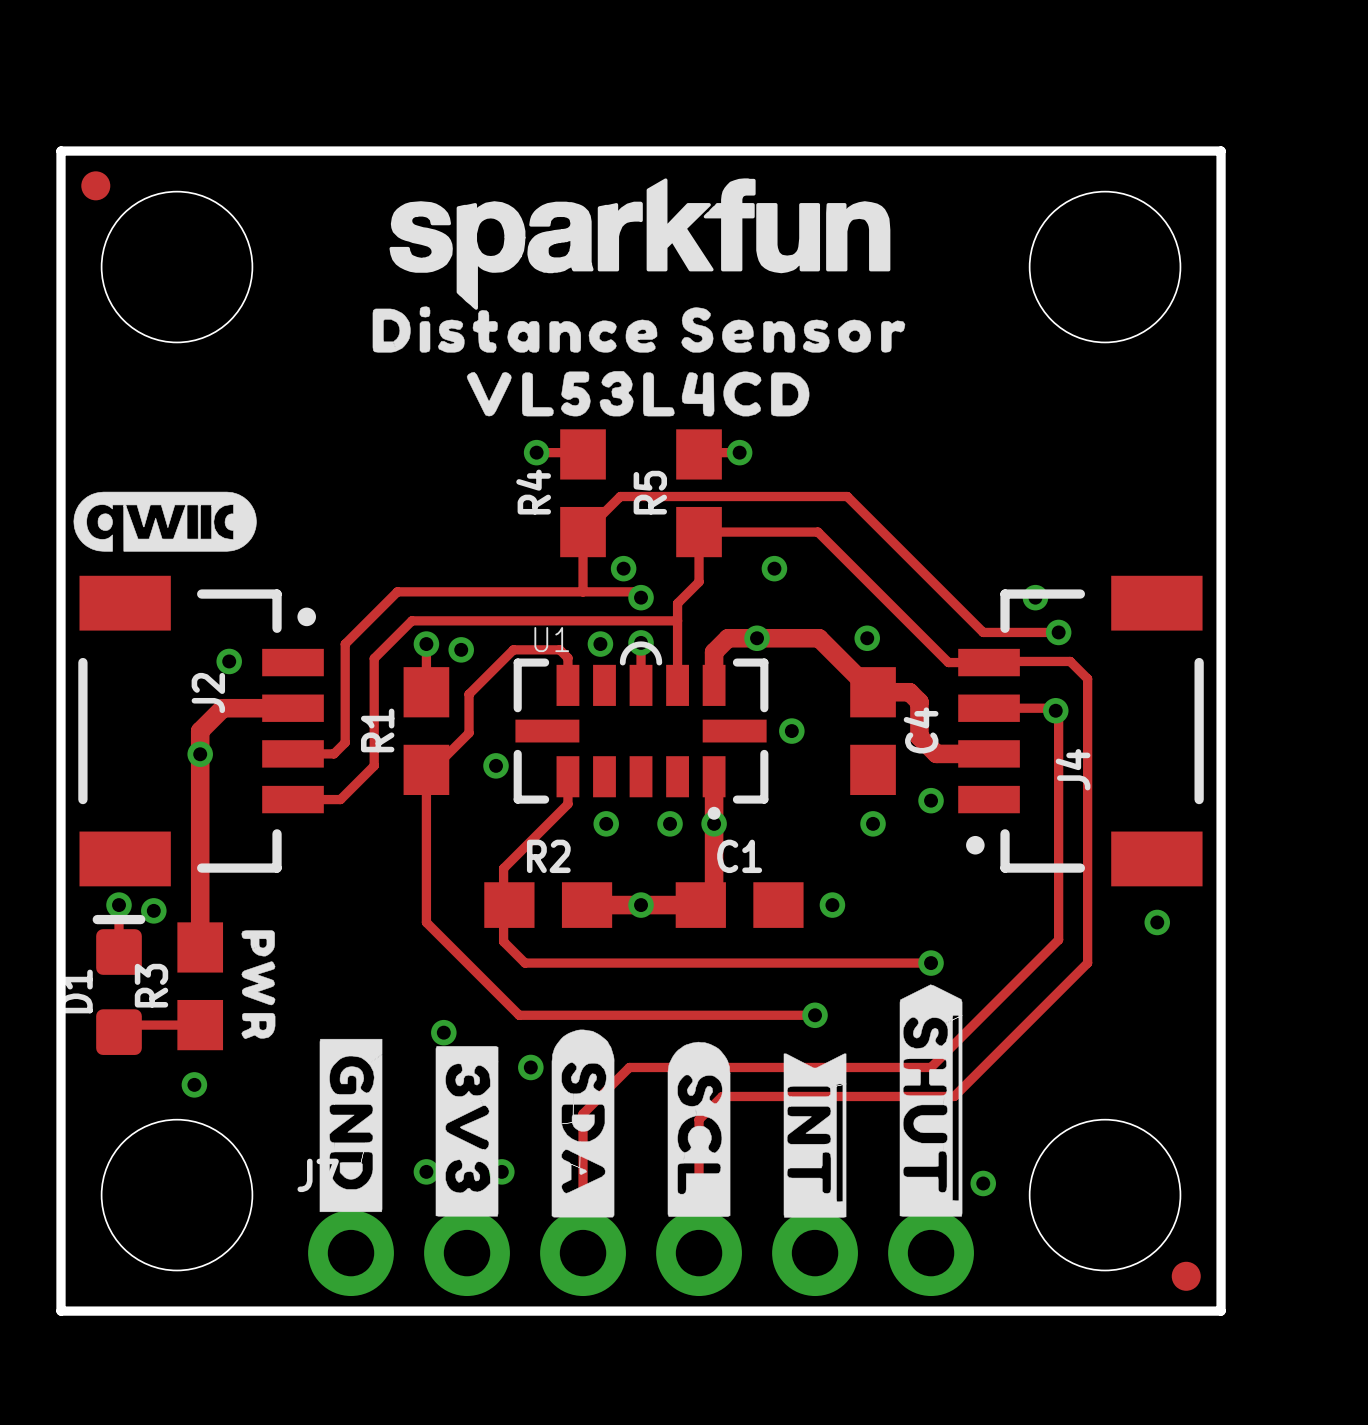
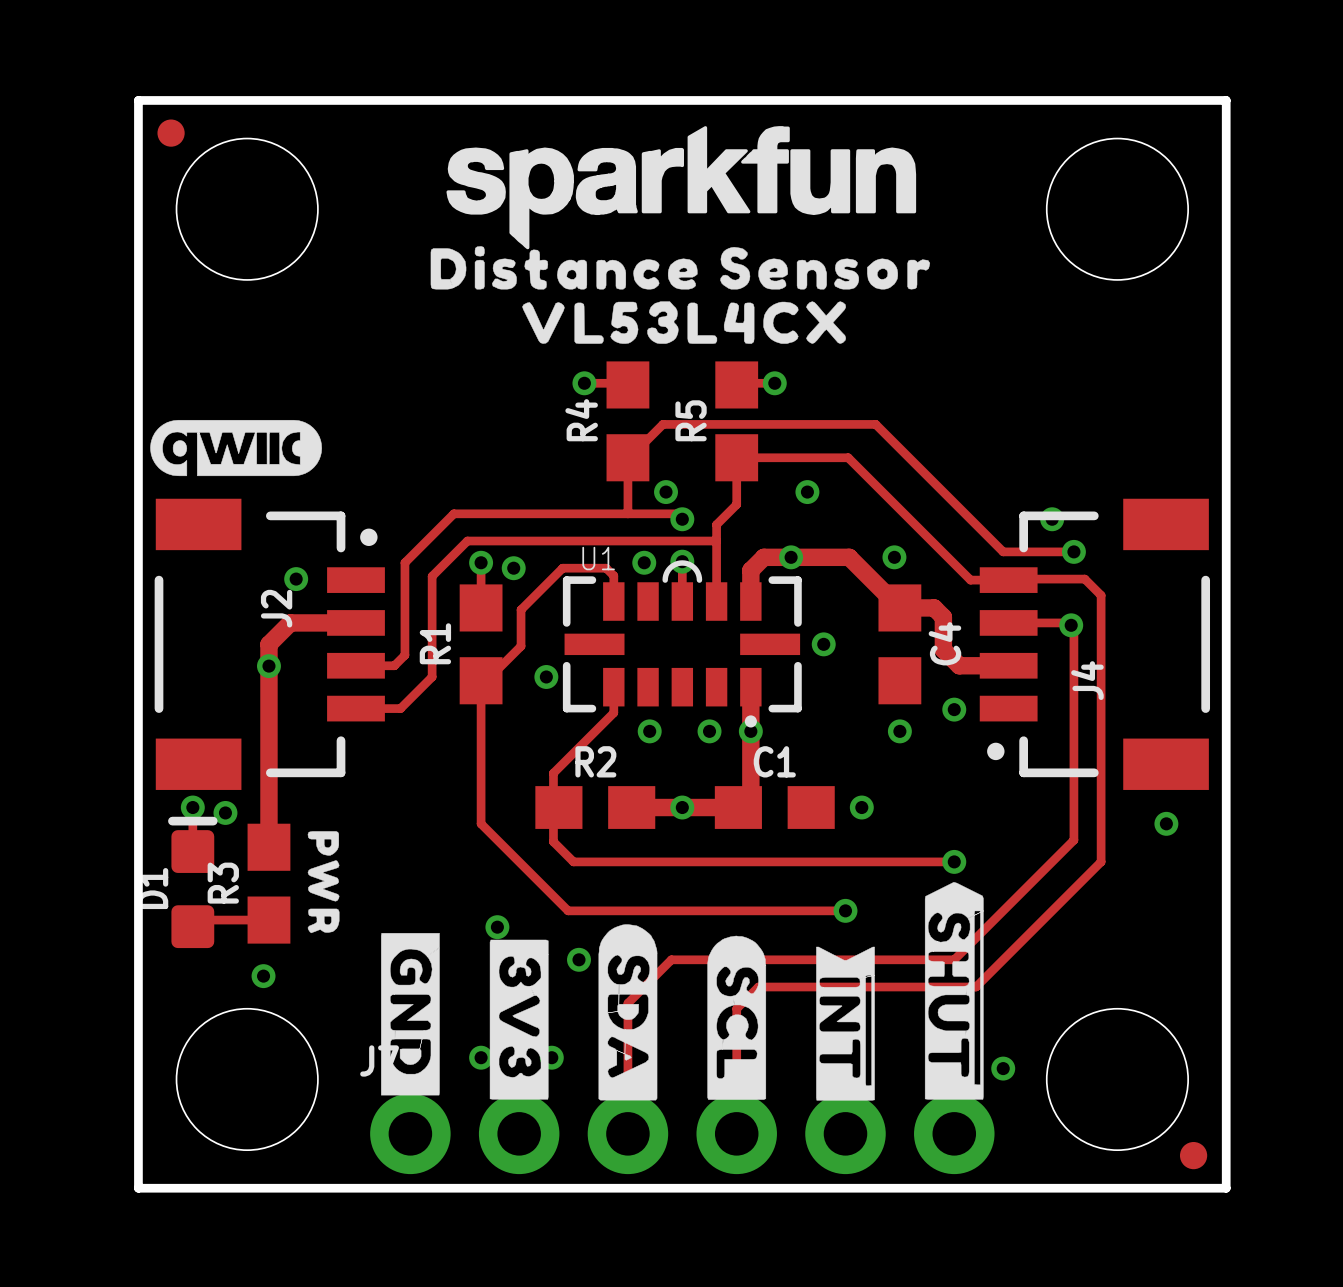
drawing shape: [466, 371, 810, 417] -> [522, 301, 847, 344]

